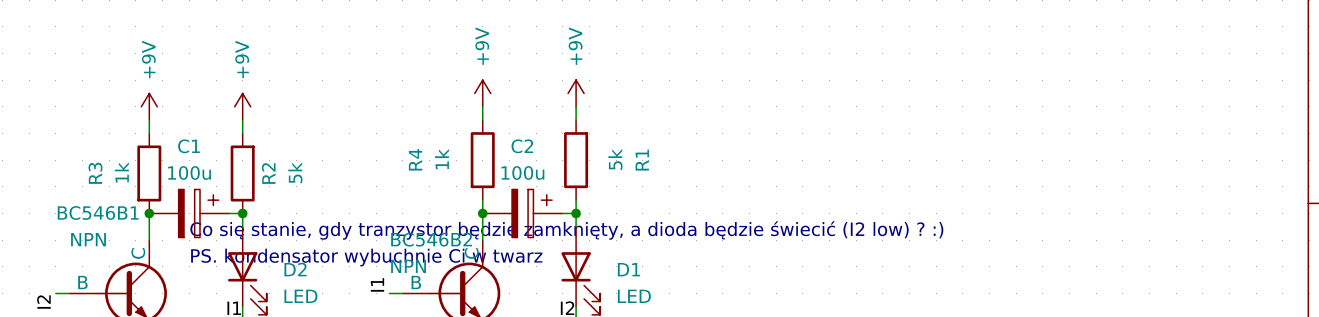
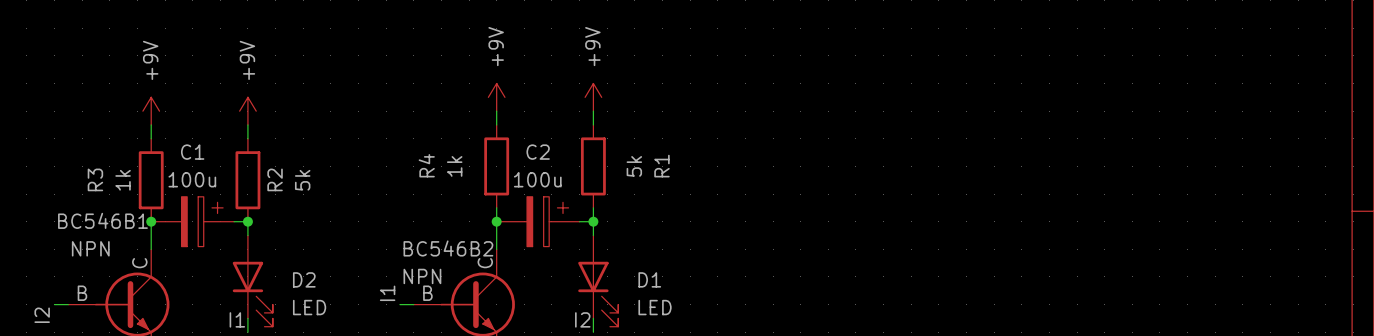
text: Co się stanie, gdy tranzystor będzie zamknięty, a dioda będzie świecić (I2 low) ? :) (566, 230) -> none
text: PS. kondensator wybuchnie Ci w twarz (366, 257) -> none

